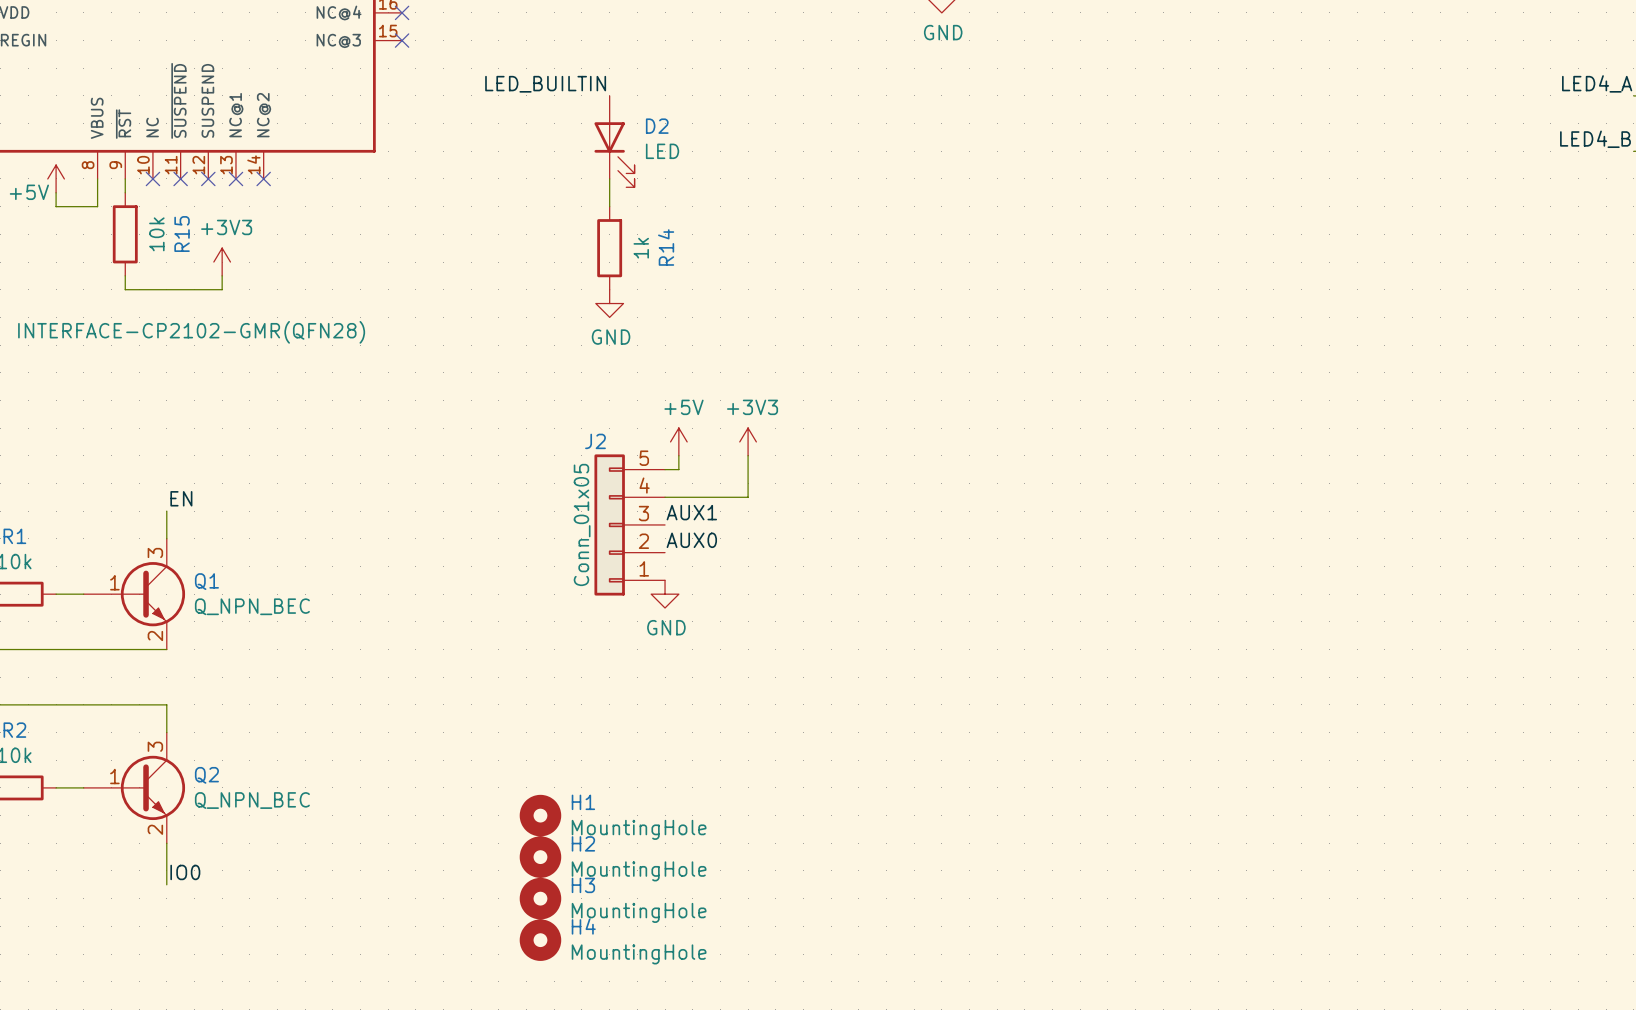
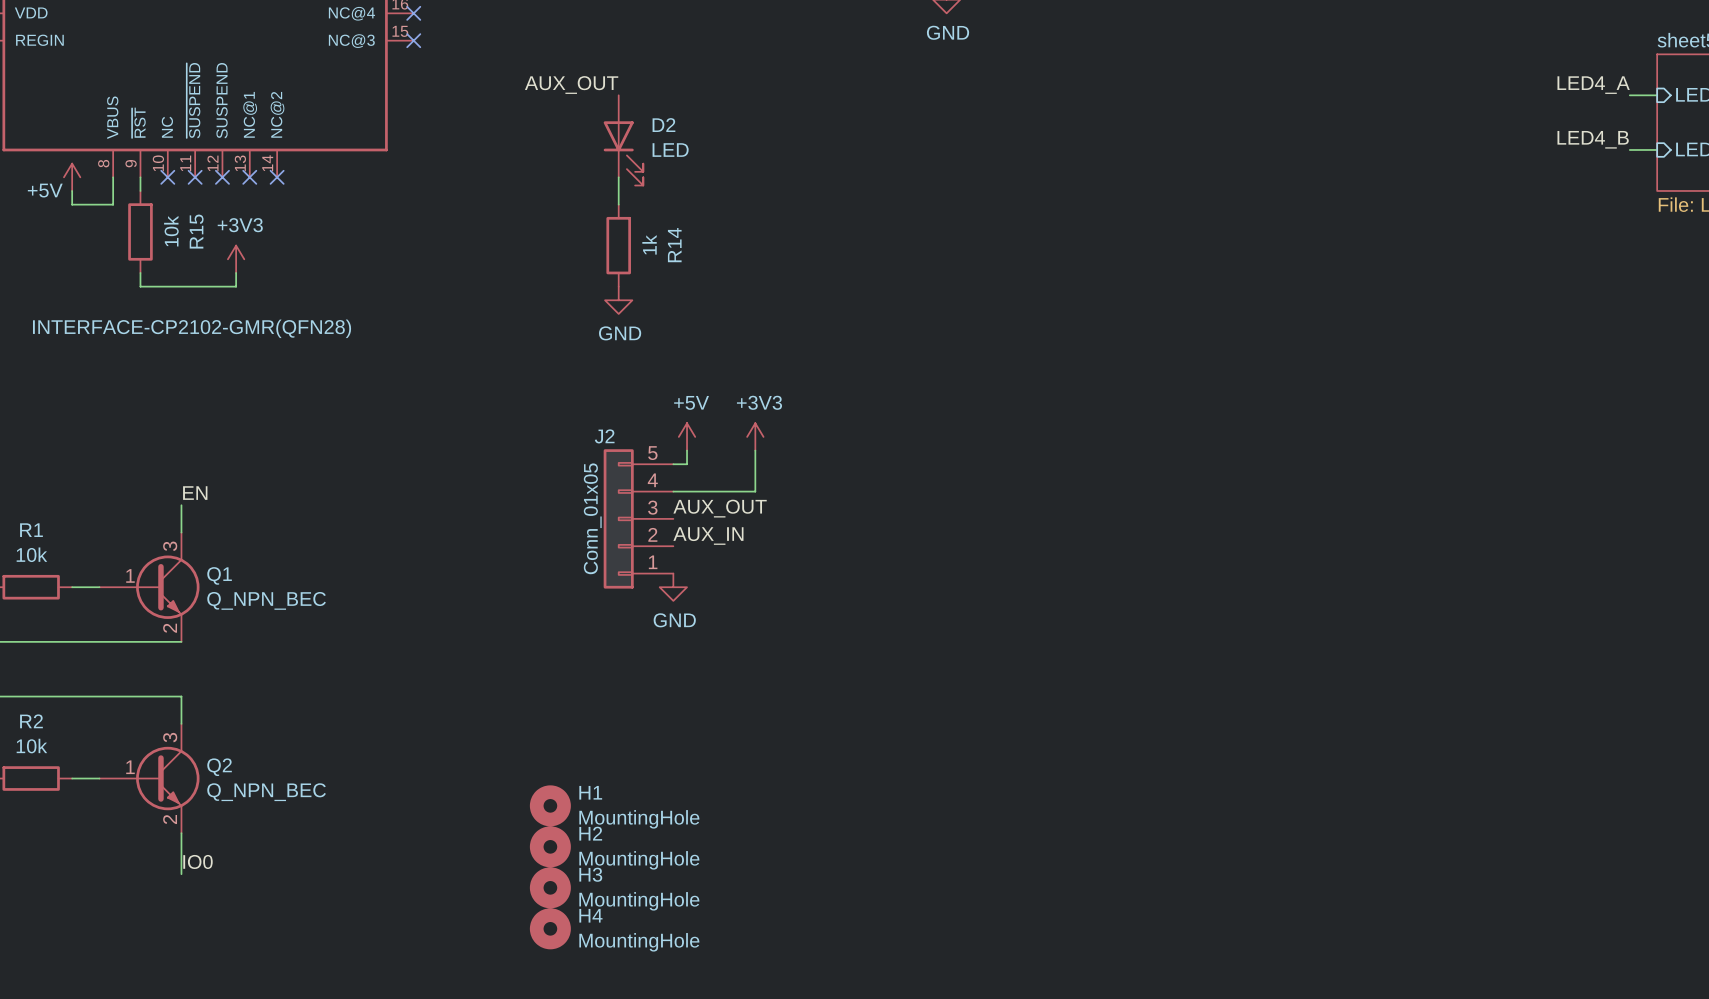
label: LED_BUILTIN (545, 84) -> AUX_OUT (571, 85)
label: AUX1 (691, 512) -> AUX_OUT (720, 508)
label: AUX0 (691, 540) -> AUX_IN (708, 536)

